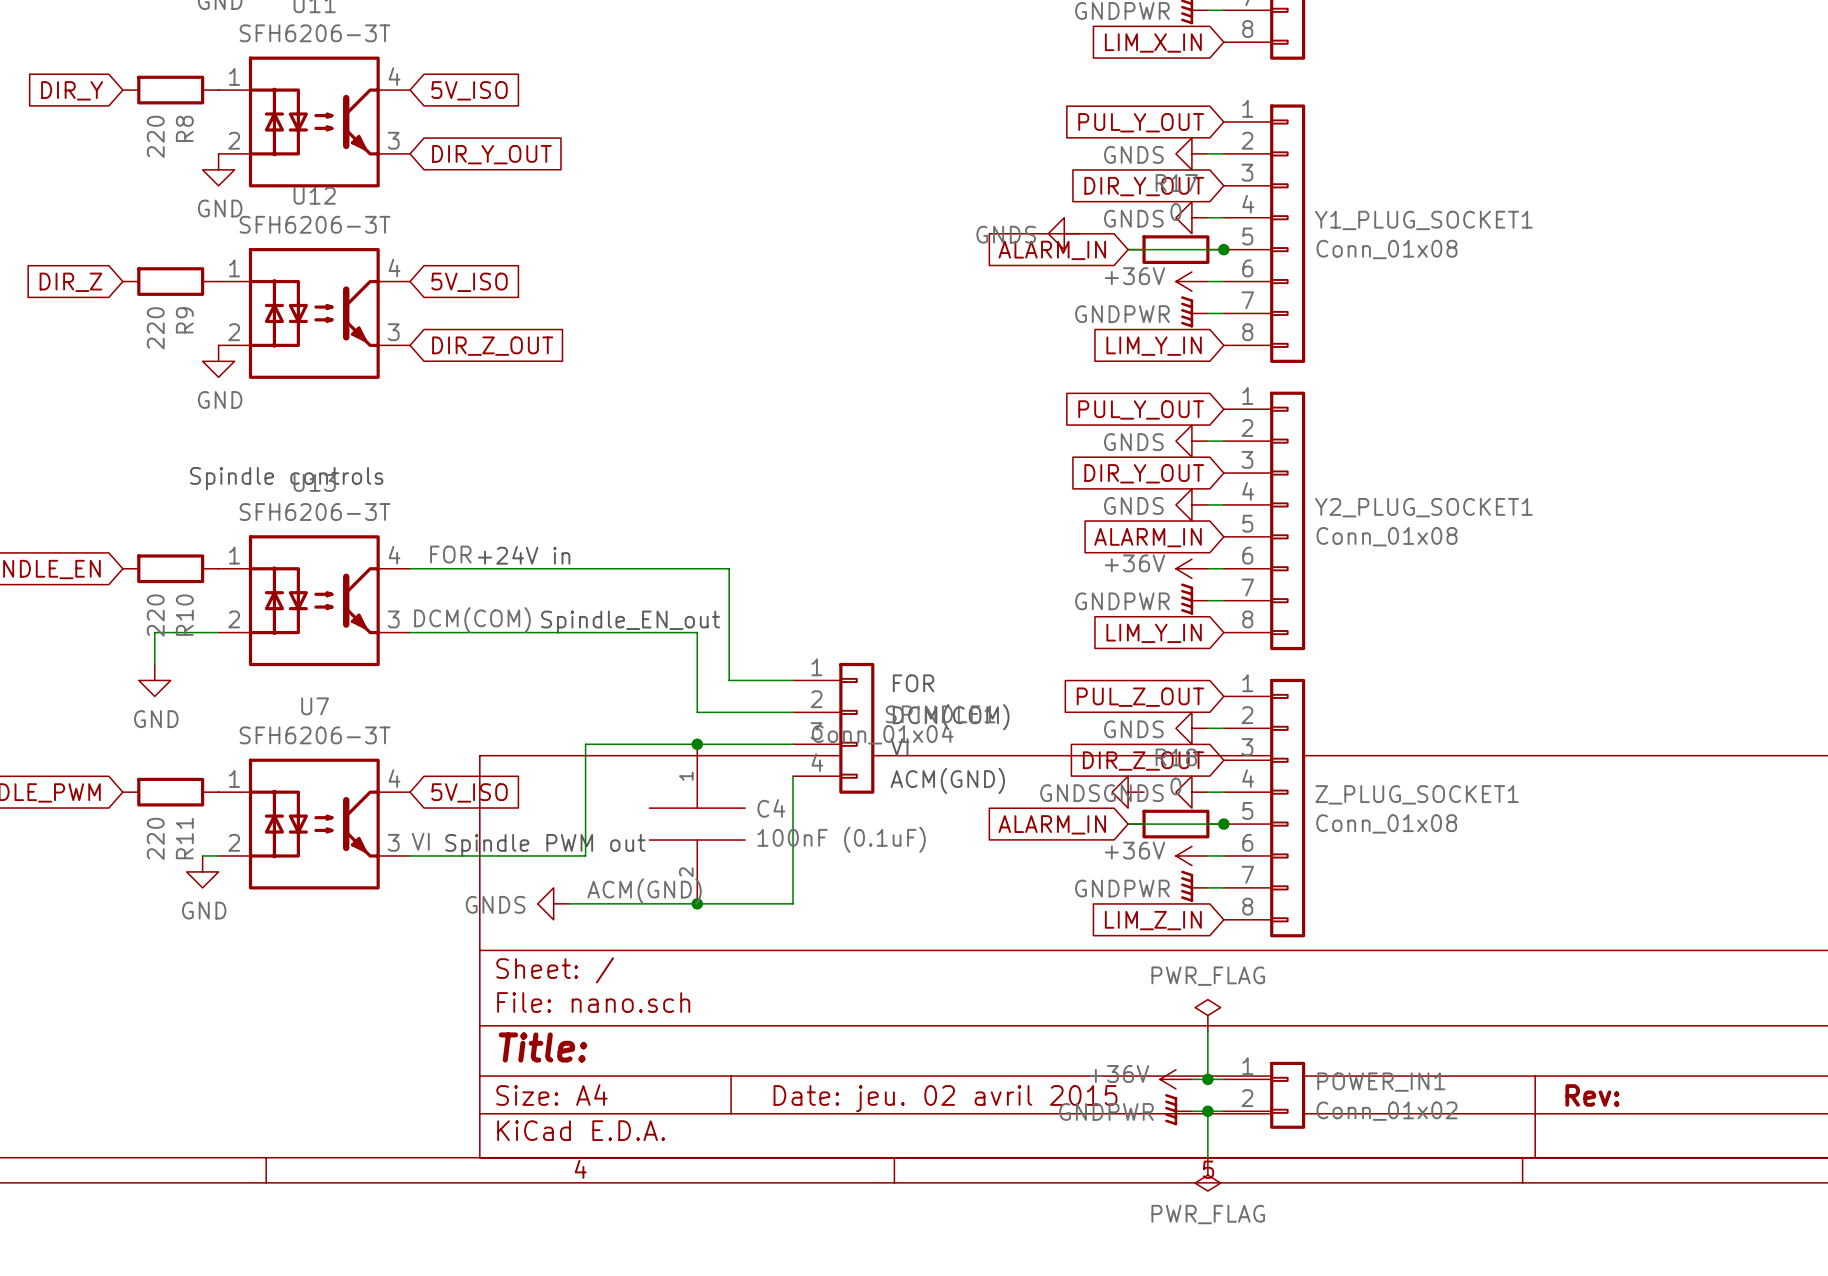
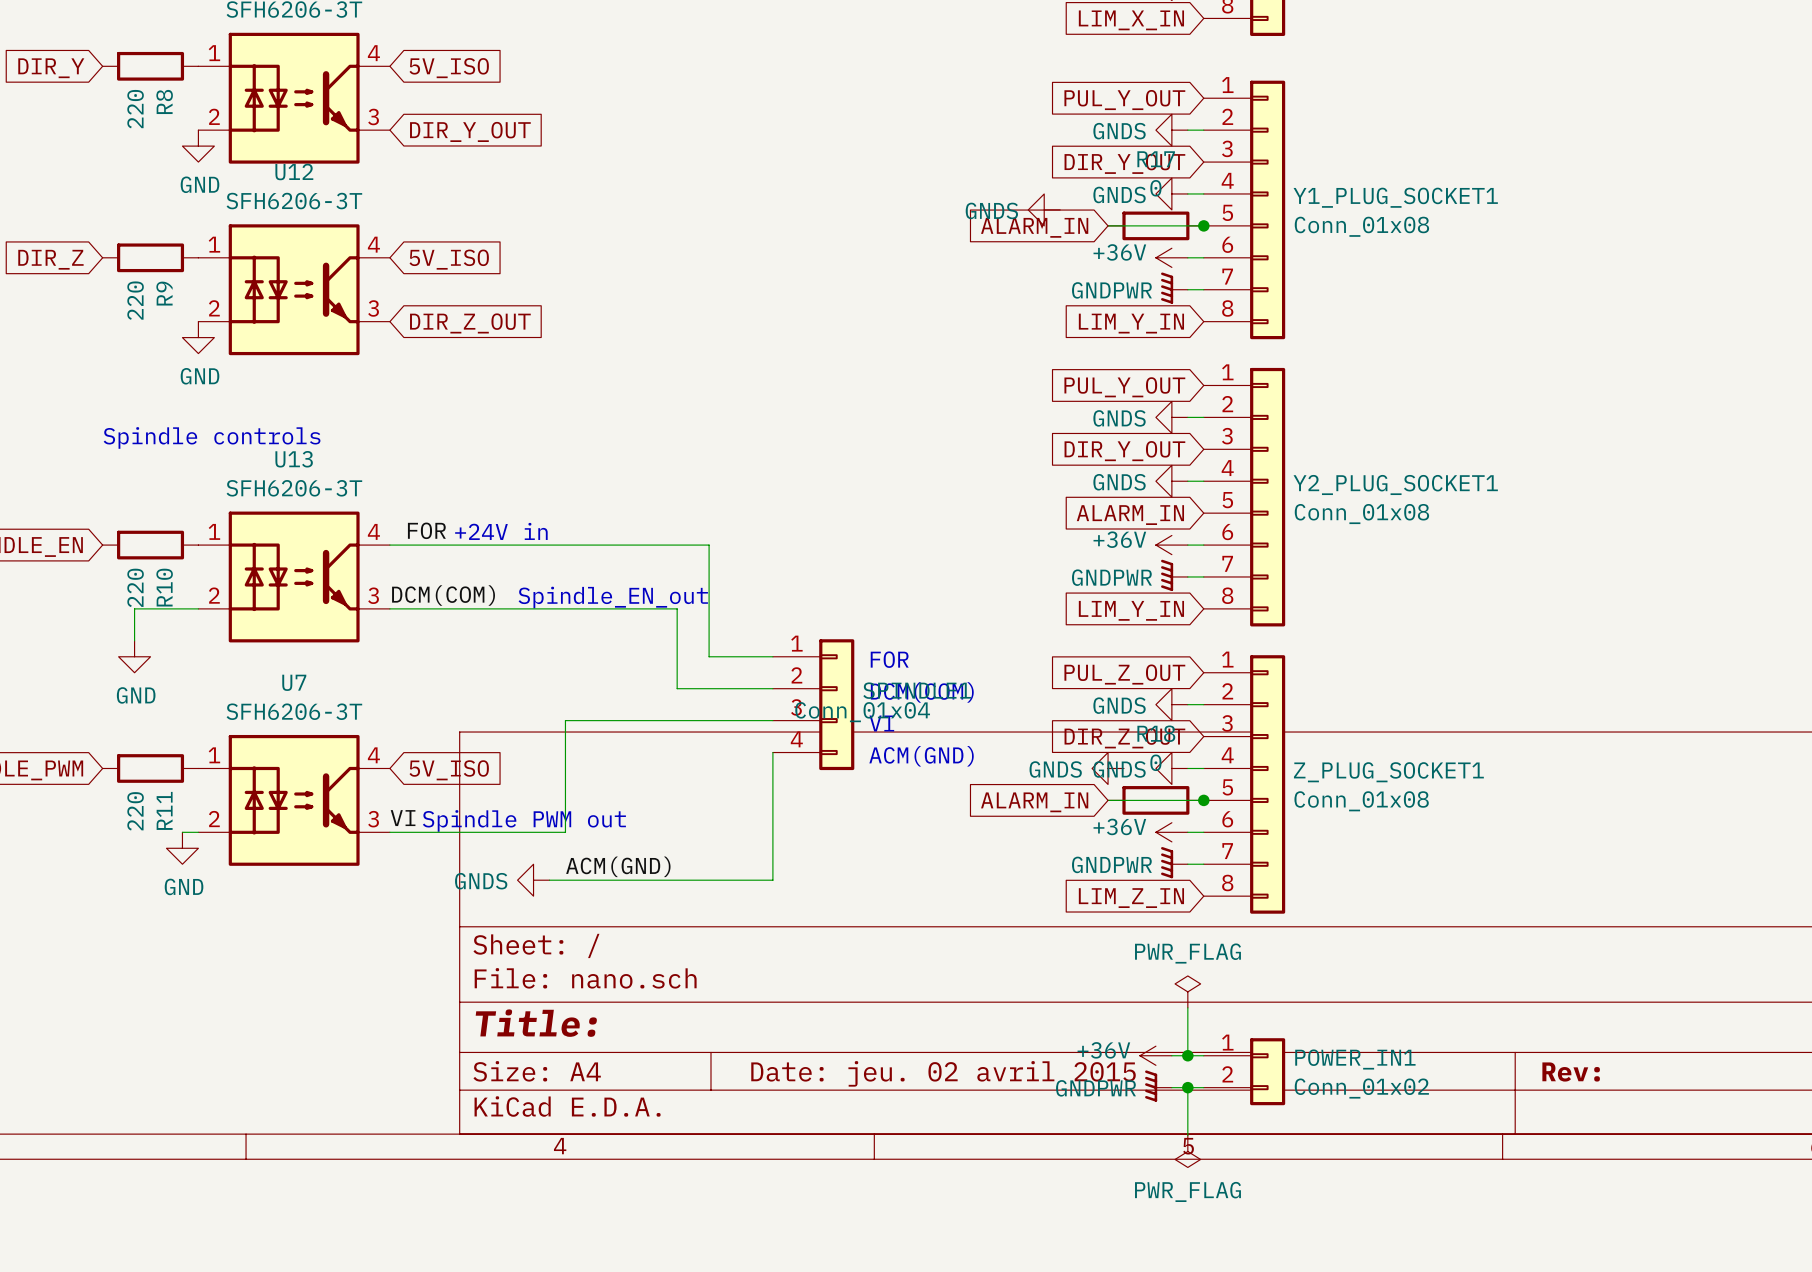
text position: Spindle controls (286, 478) -> Spindle controls (212, 437)
junction: (697, 744) -> none
C4: 100nF (0.1uF) (697, 824) -> none
junction: (697, 903) -> none

